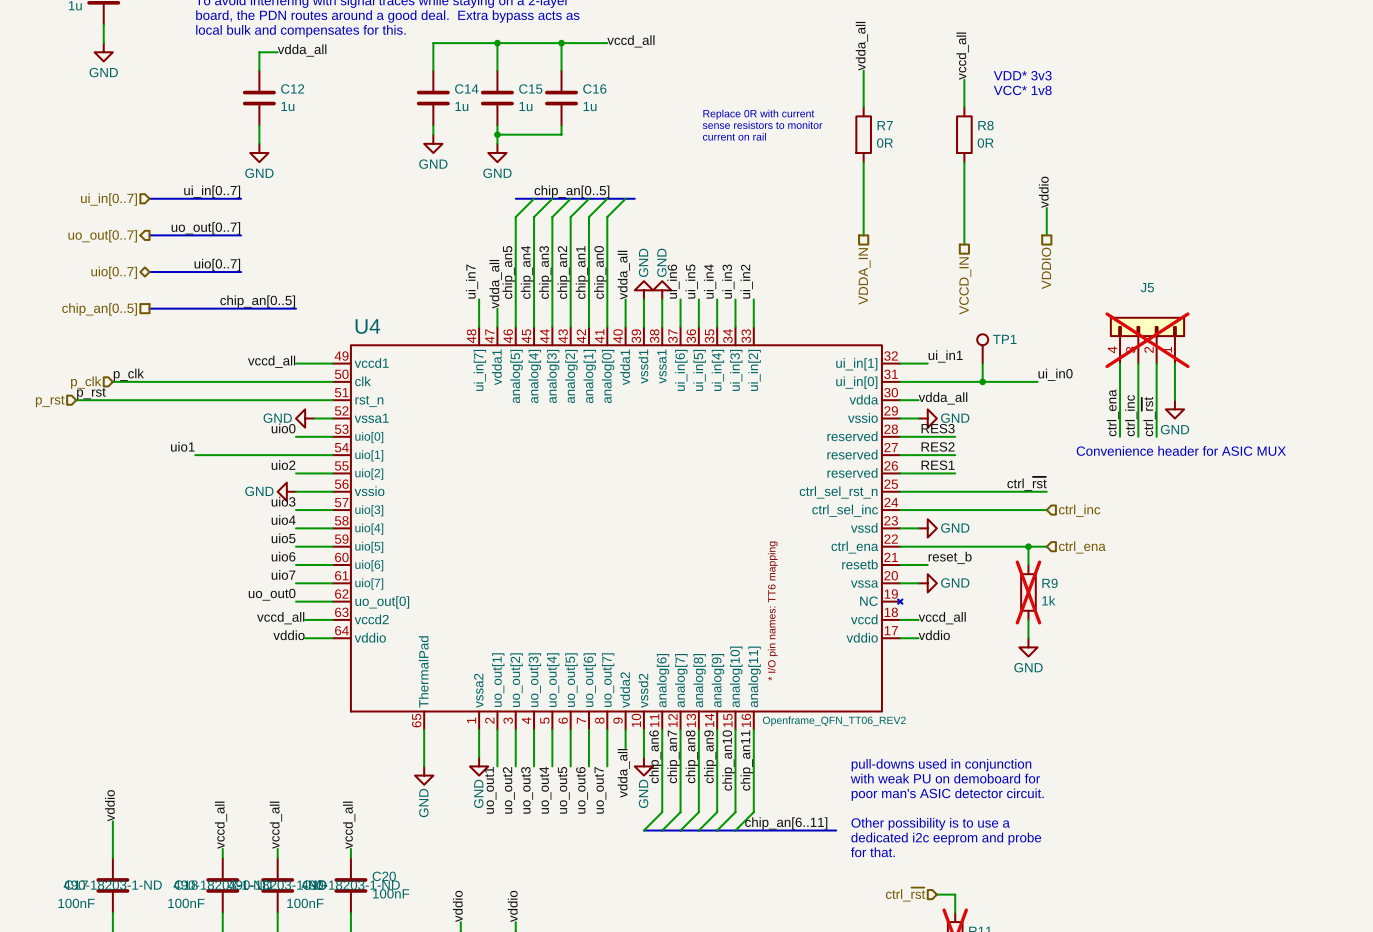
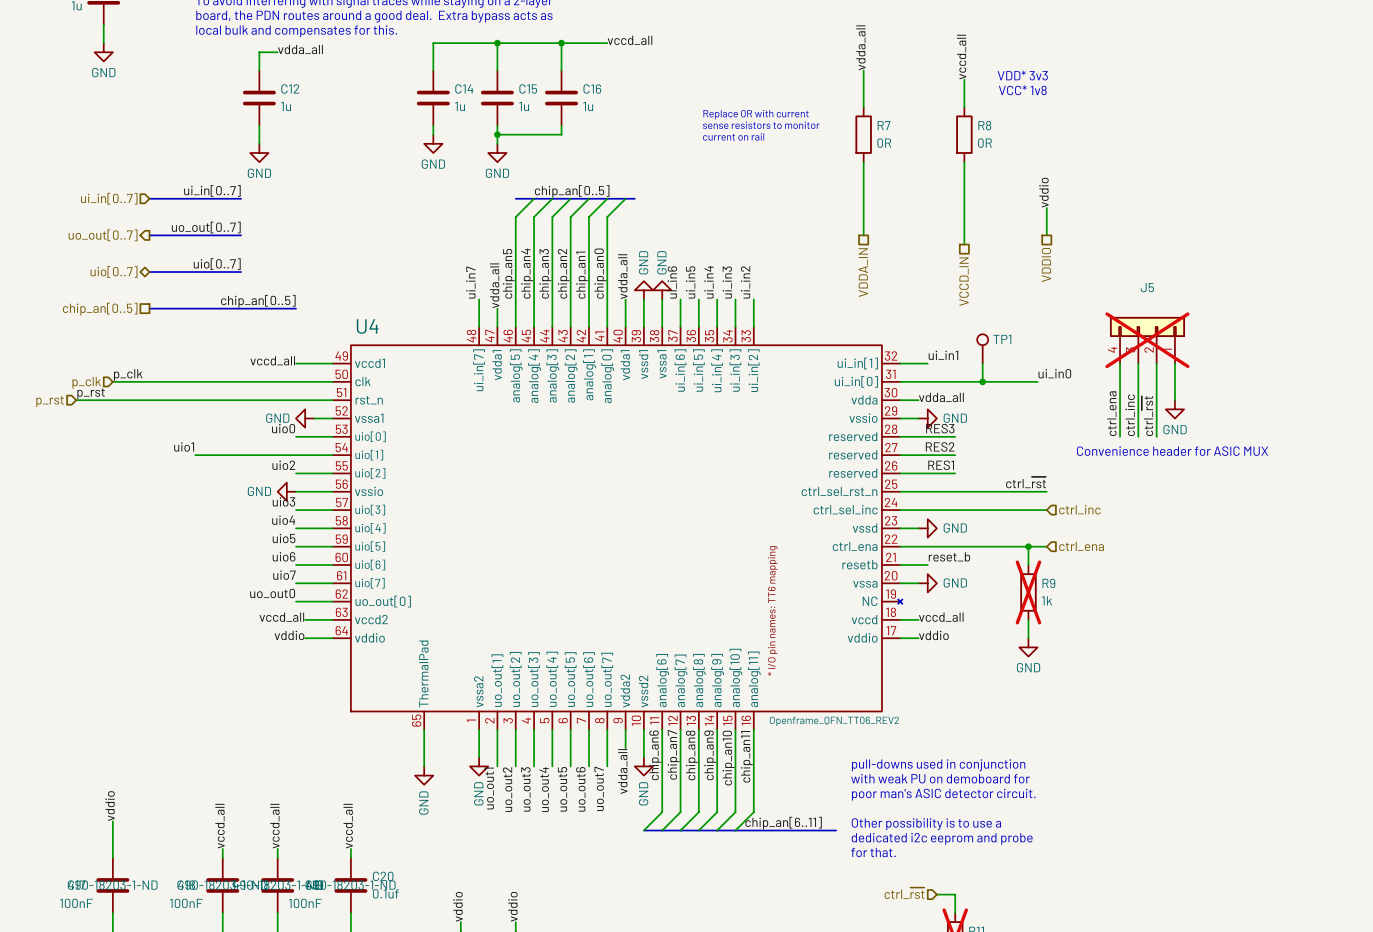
C20 value: 100nF (391, 893) -> 0.1uf (385, 893)

